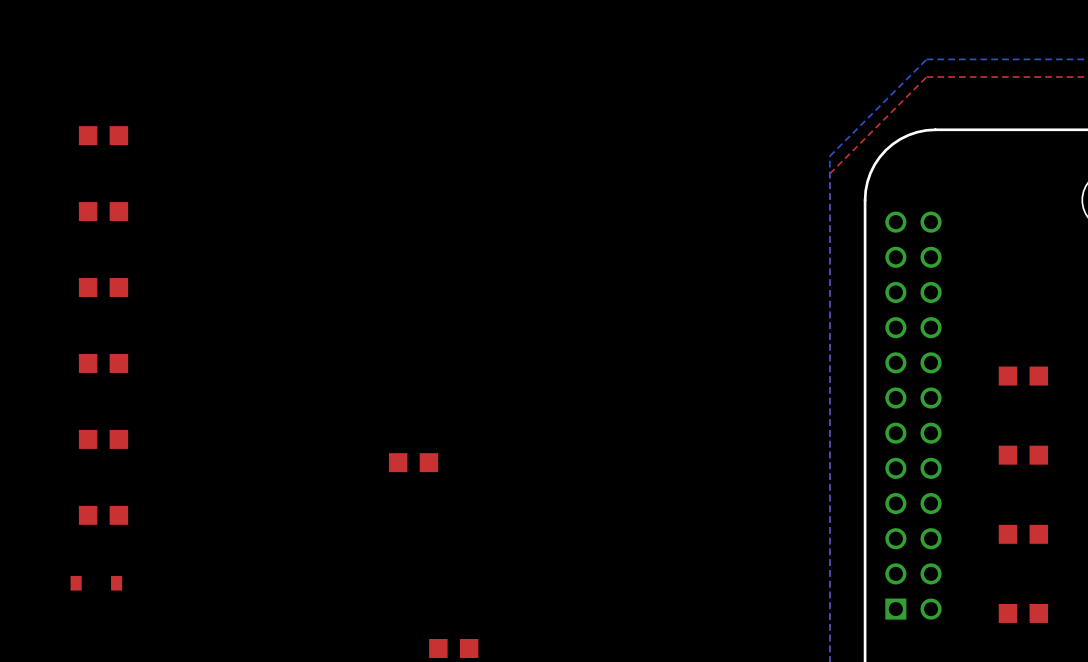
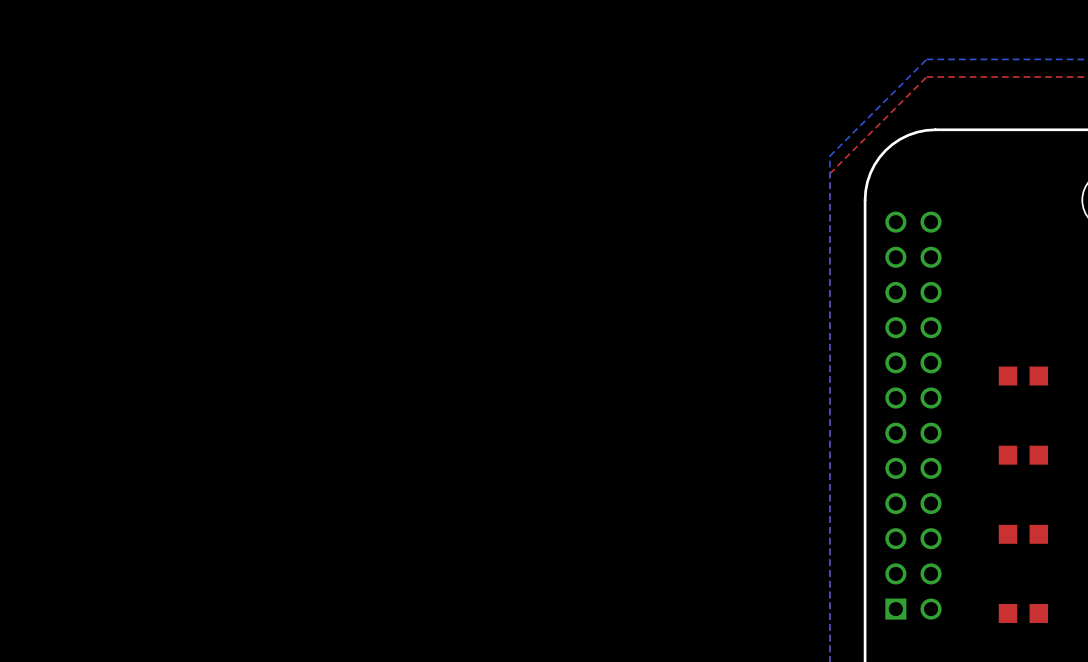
part: (103, 135) -> none
part: (103, 211) -> none
part: (103, 287) -> none
part: (103, 363) -> none
part: (103, 439) -> none
part: (413, 462) -> none
part: (103, 515) -> none
part: (96, 583) -> none
part: (453, 648) -> none

